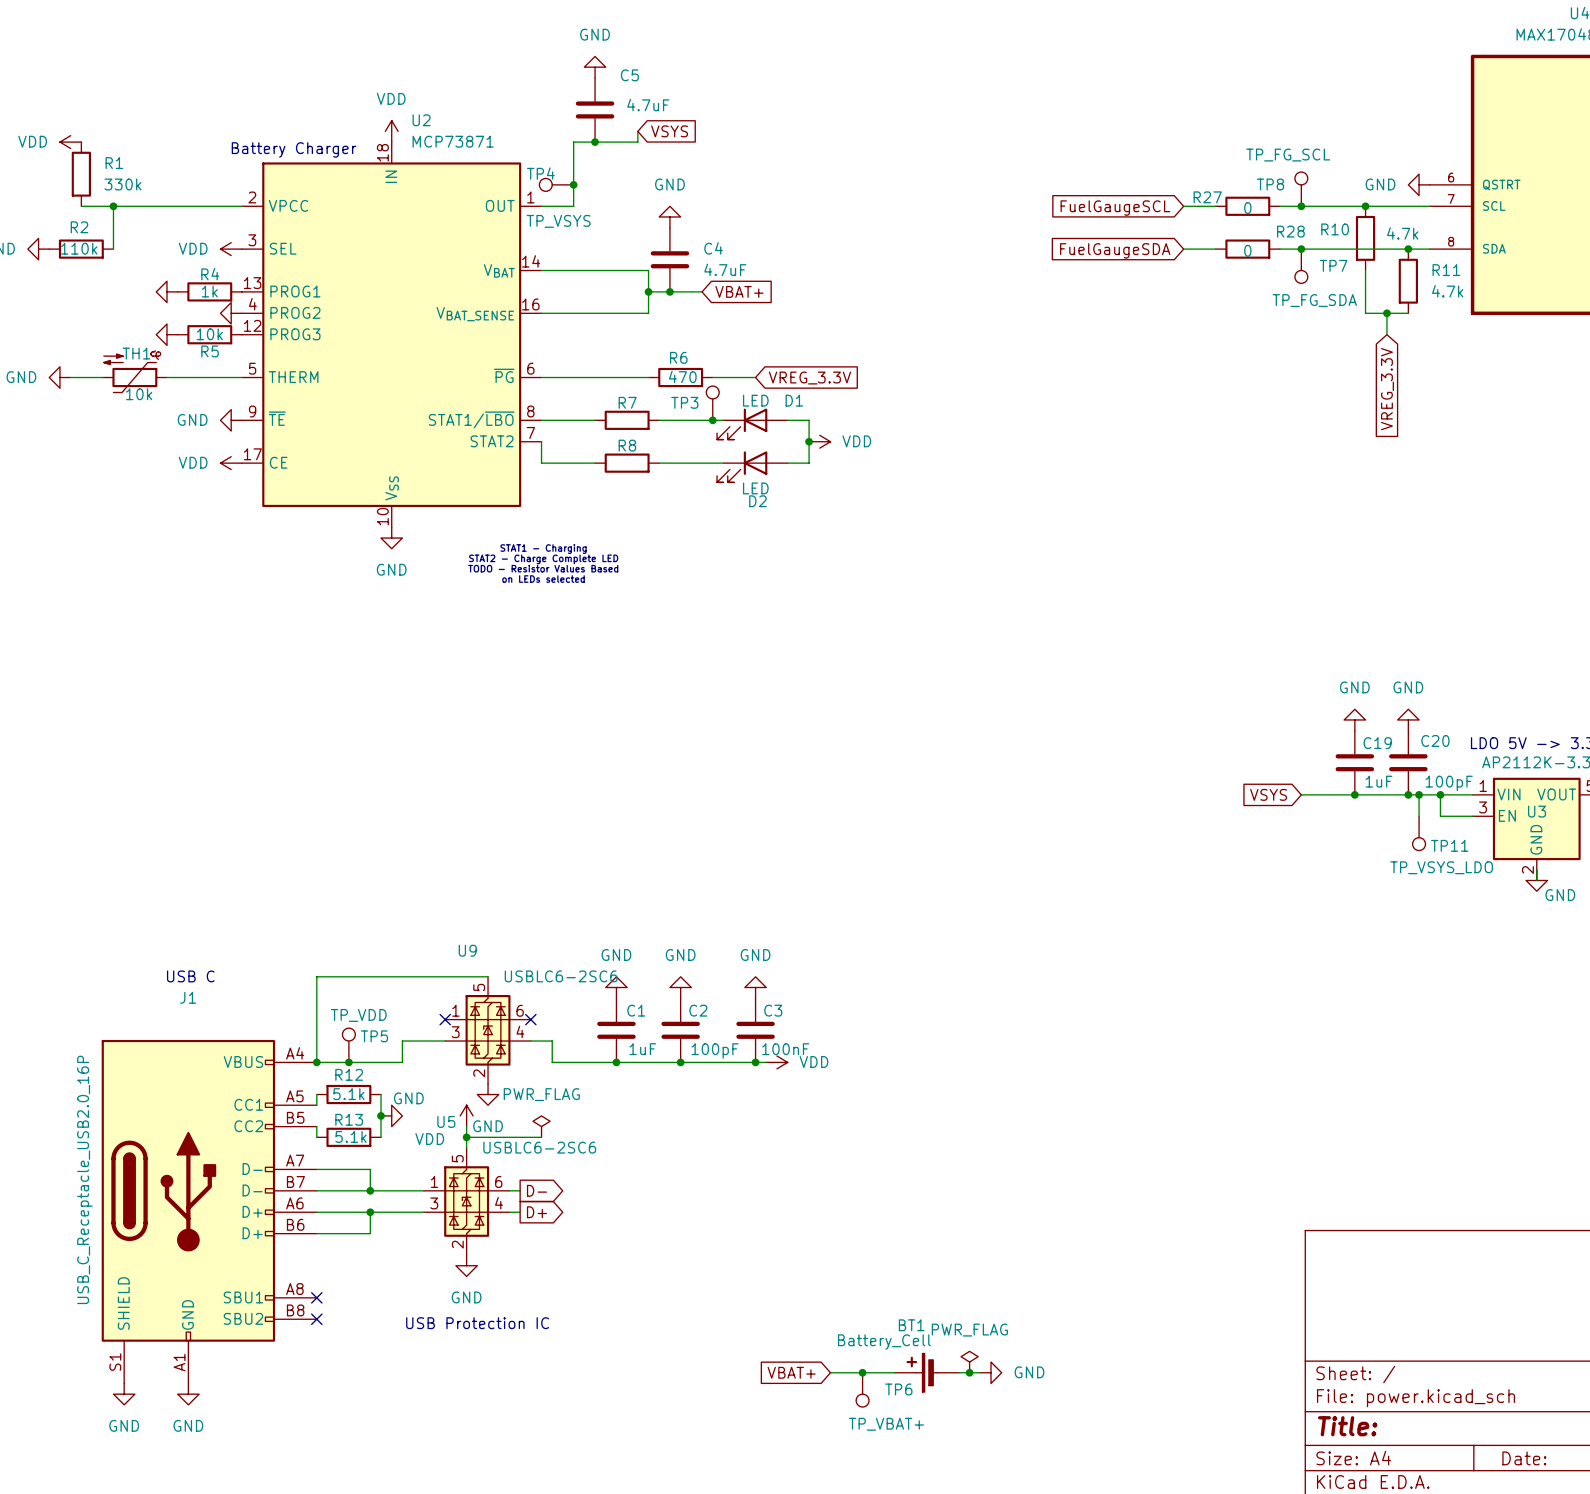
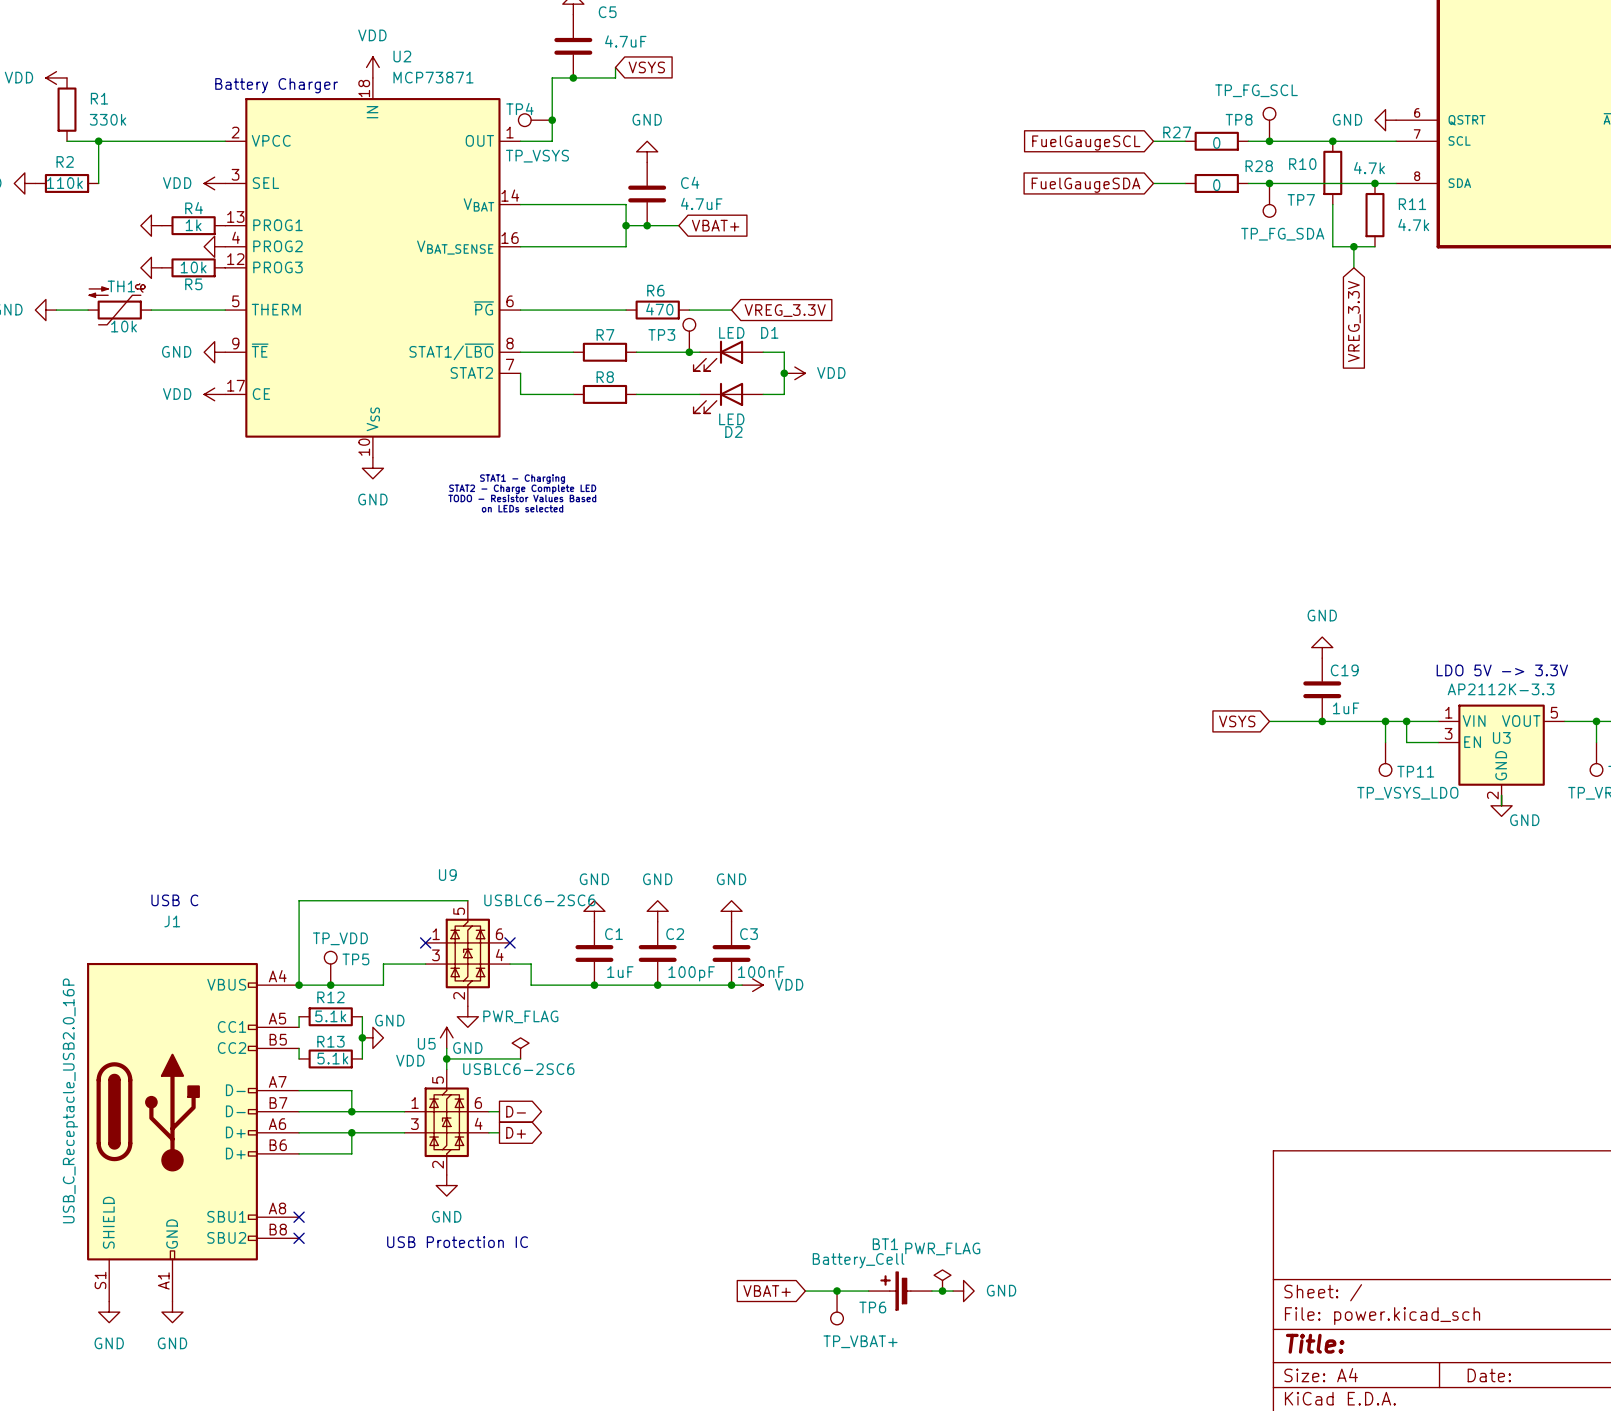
power symbol: GND (1408, 719) -> none
C20: 100pF (1408, 762) -> none
junction: (1408, 794) -> none

